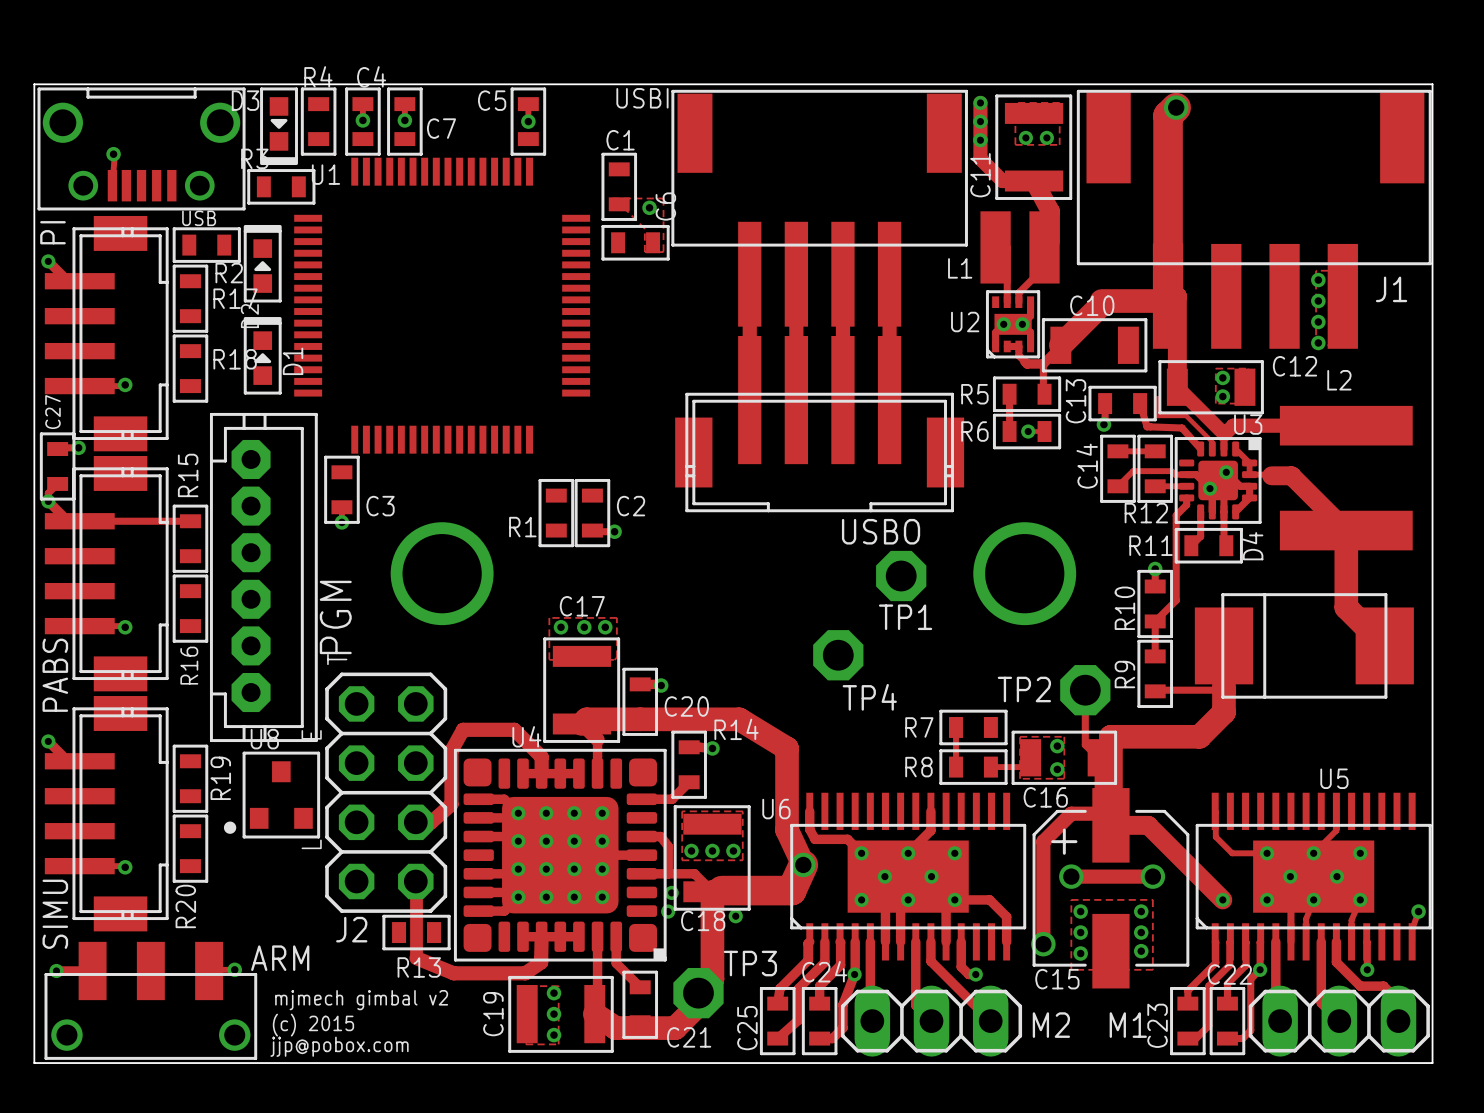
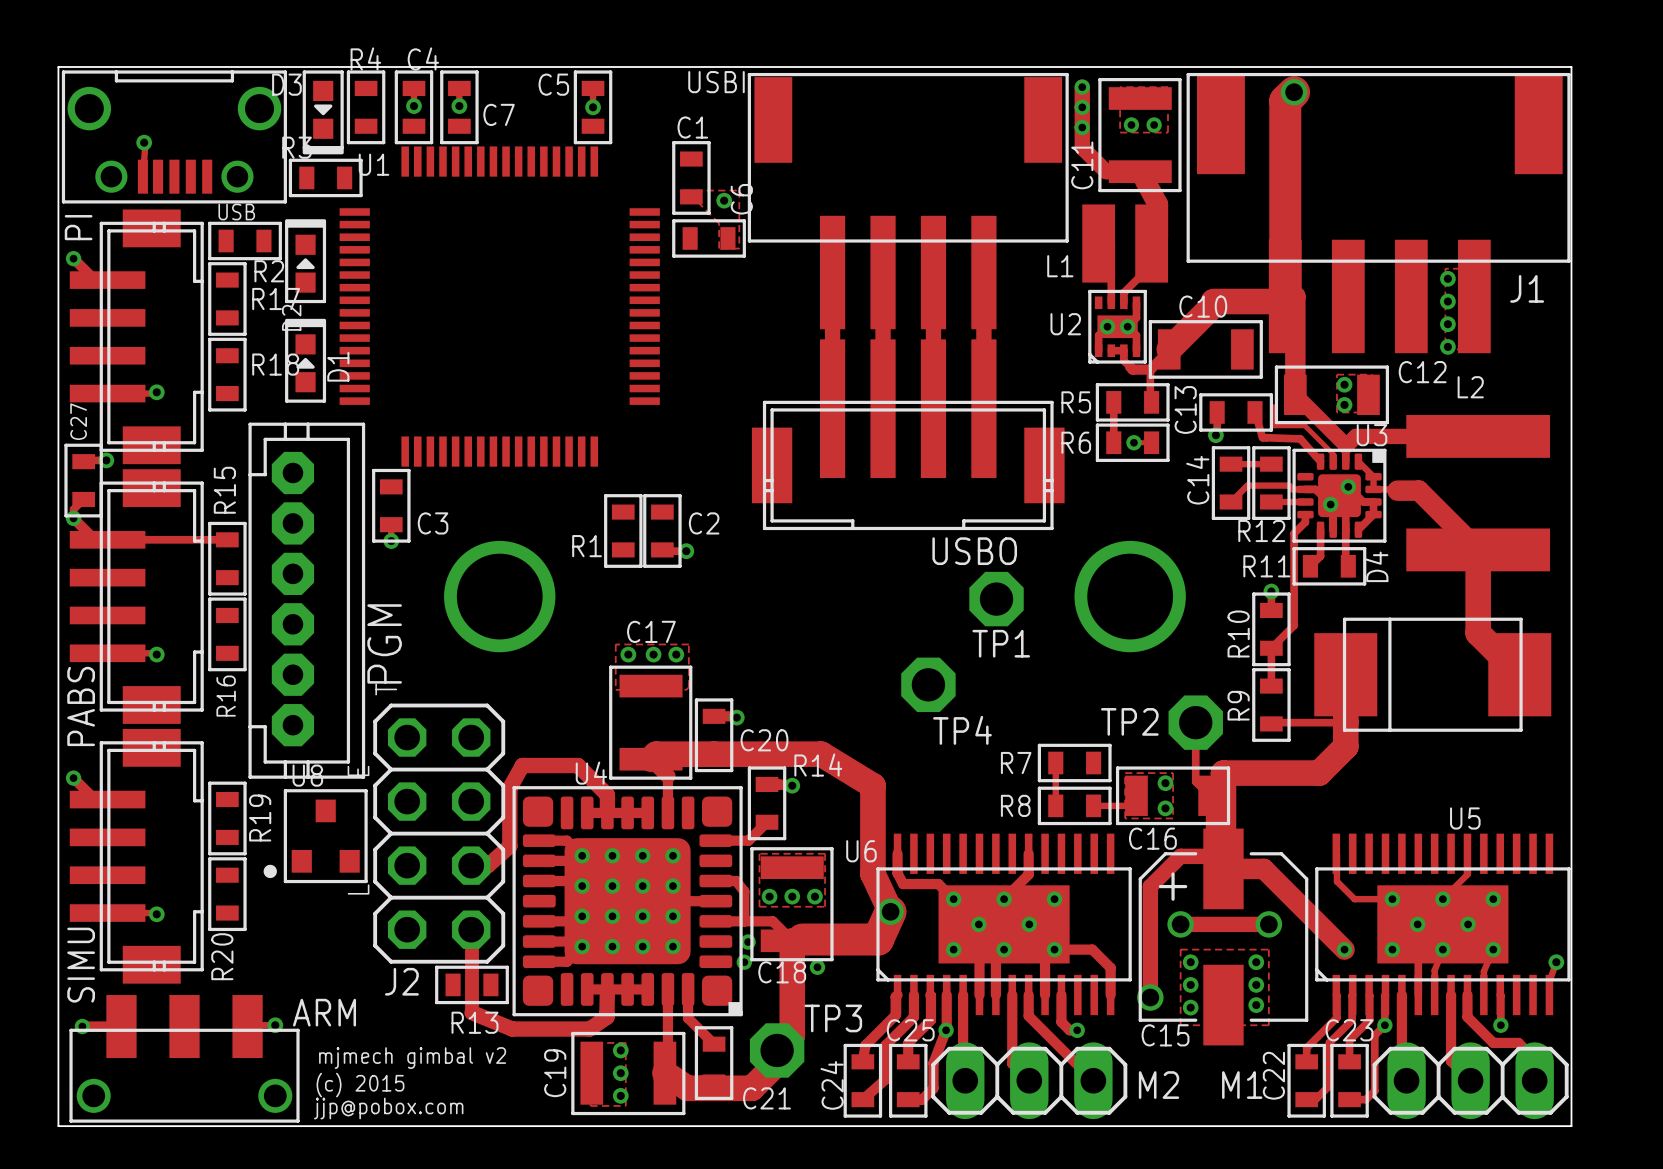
C24 name rotation: 0° (824, 971) -> 90° counterclockwise (832, 1085)
C24 name position: C24 (824, 971) -> C24 (832, 1085)
C22 name rotation: 0° (1229, 974) -> 90° counterclockwise (1273, 1075)
C22 name position: C22 (1229, 974) -> C22 (1273, 1075)
C23 name rotation: 0° (1157, 1025) -> 90° clockwise (1349, 1030)
C23 name position: C23 (1157, 1025) -> C23 (1349, 1030)
C25 name rotation: 0° (747, 1028) -> 90° clockwise (910, 1030)
C25 name position: C25 (747, 1028) -> C25 (910, 1030)

